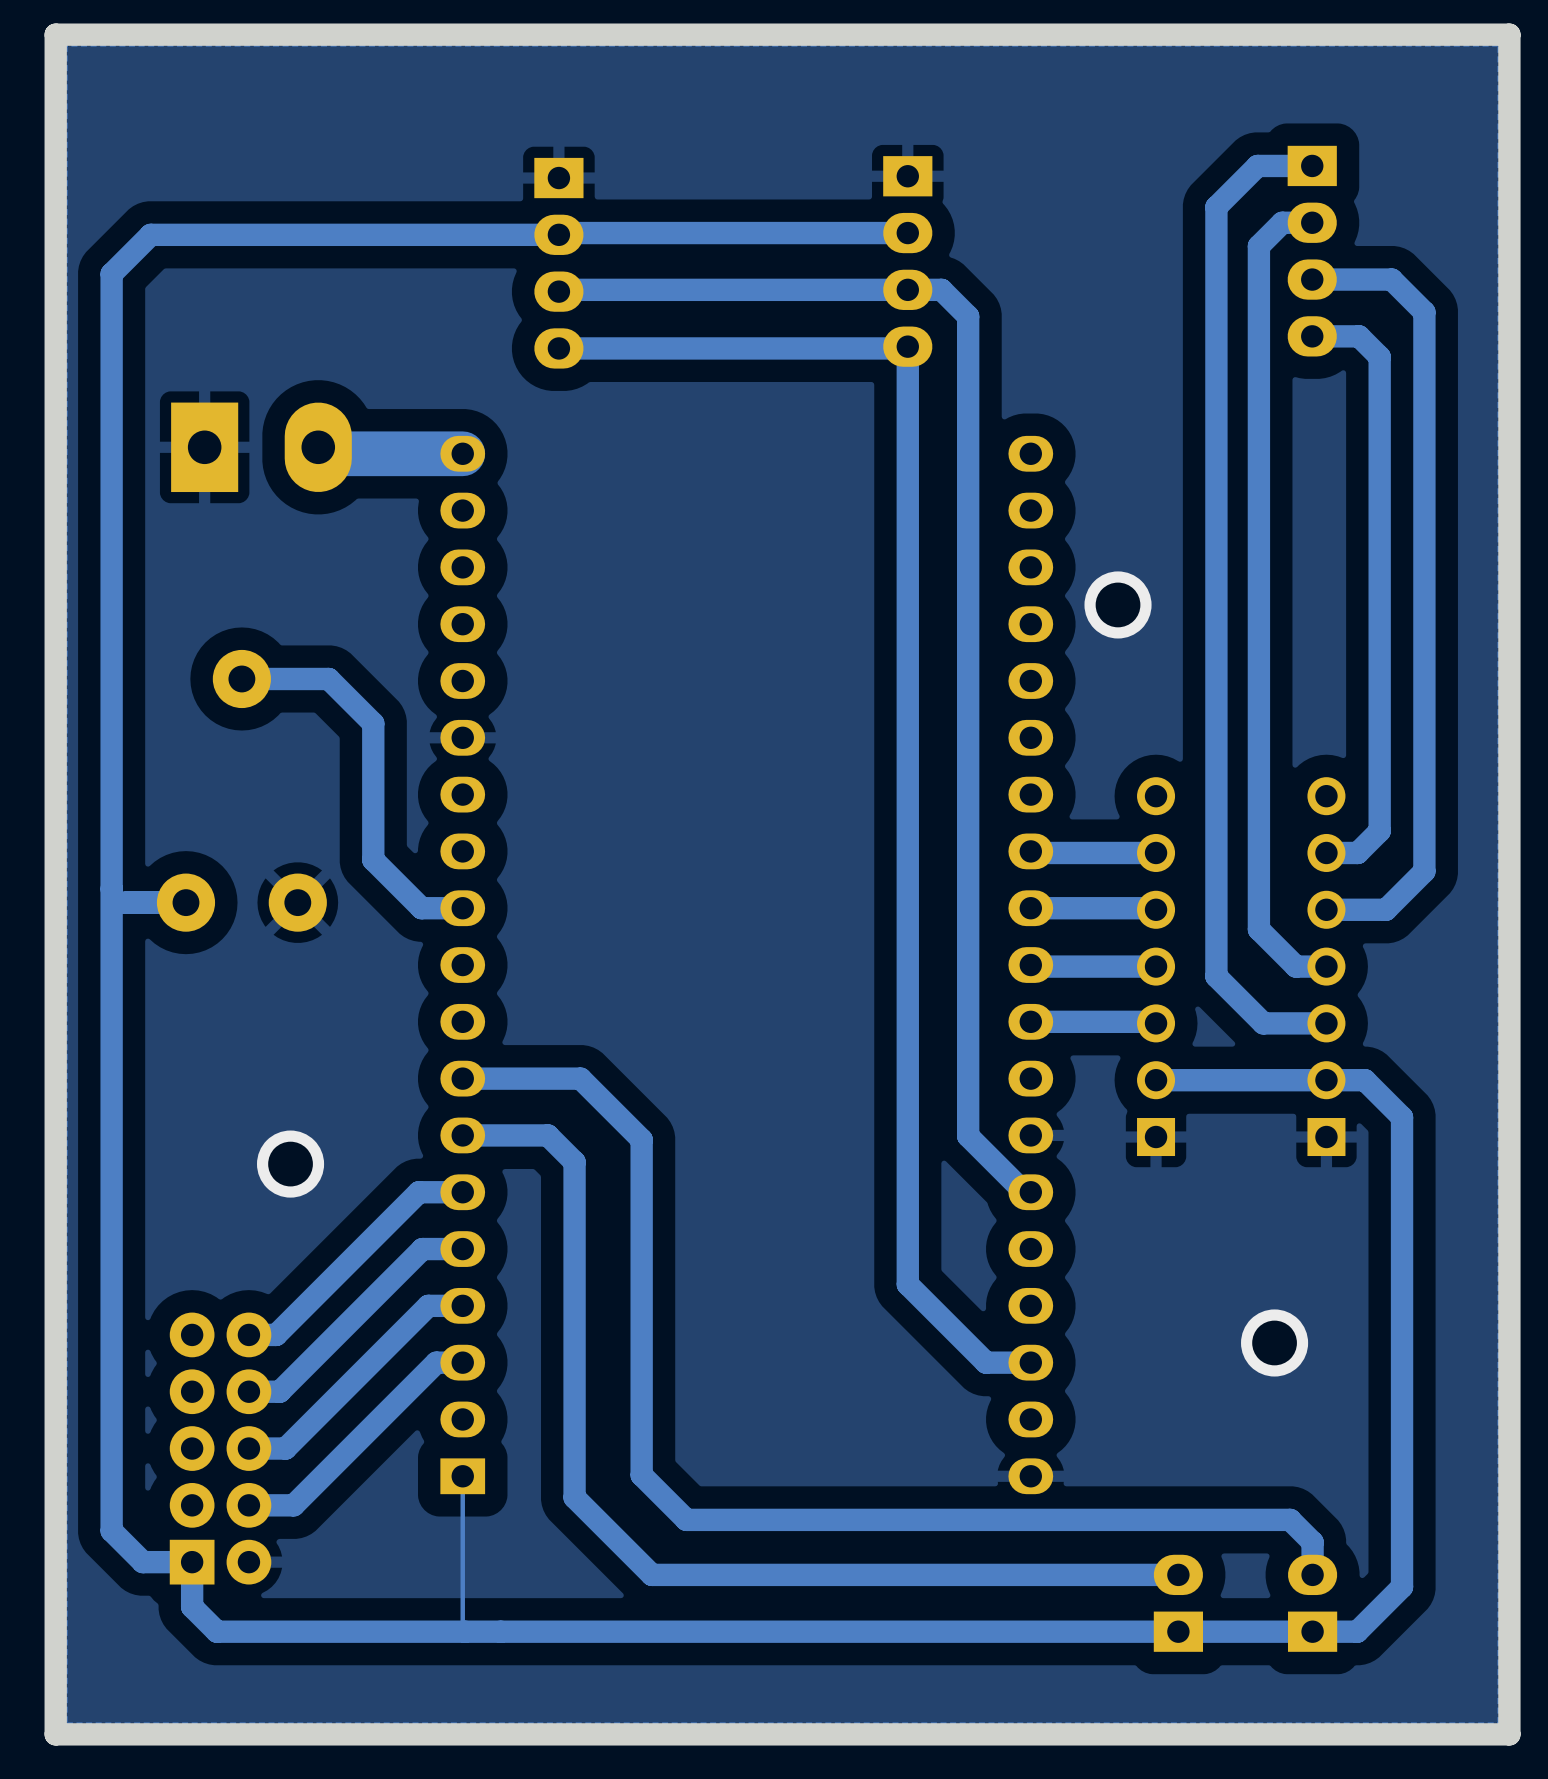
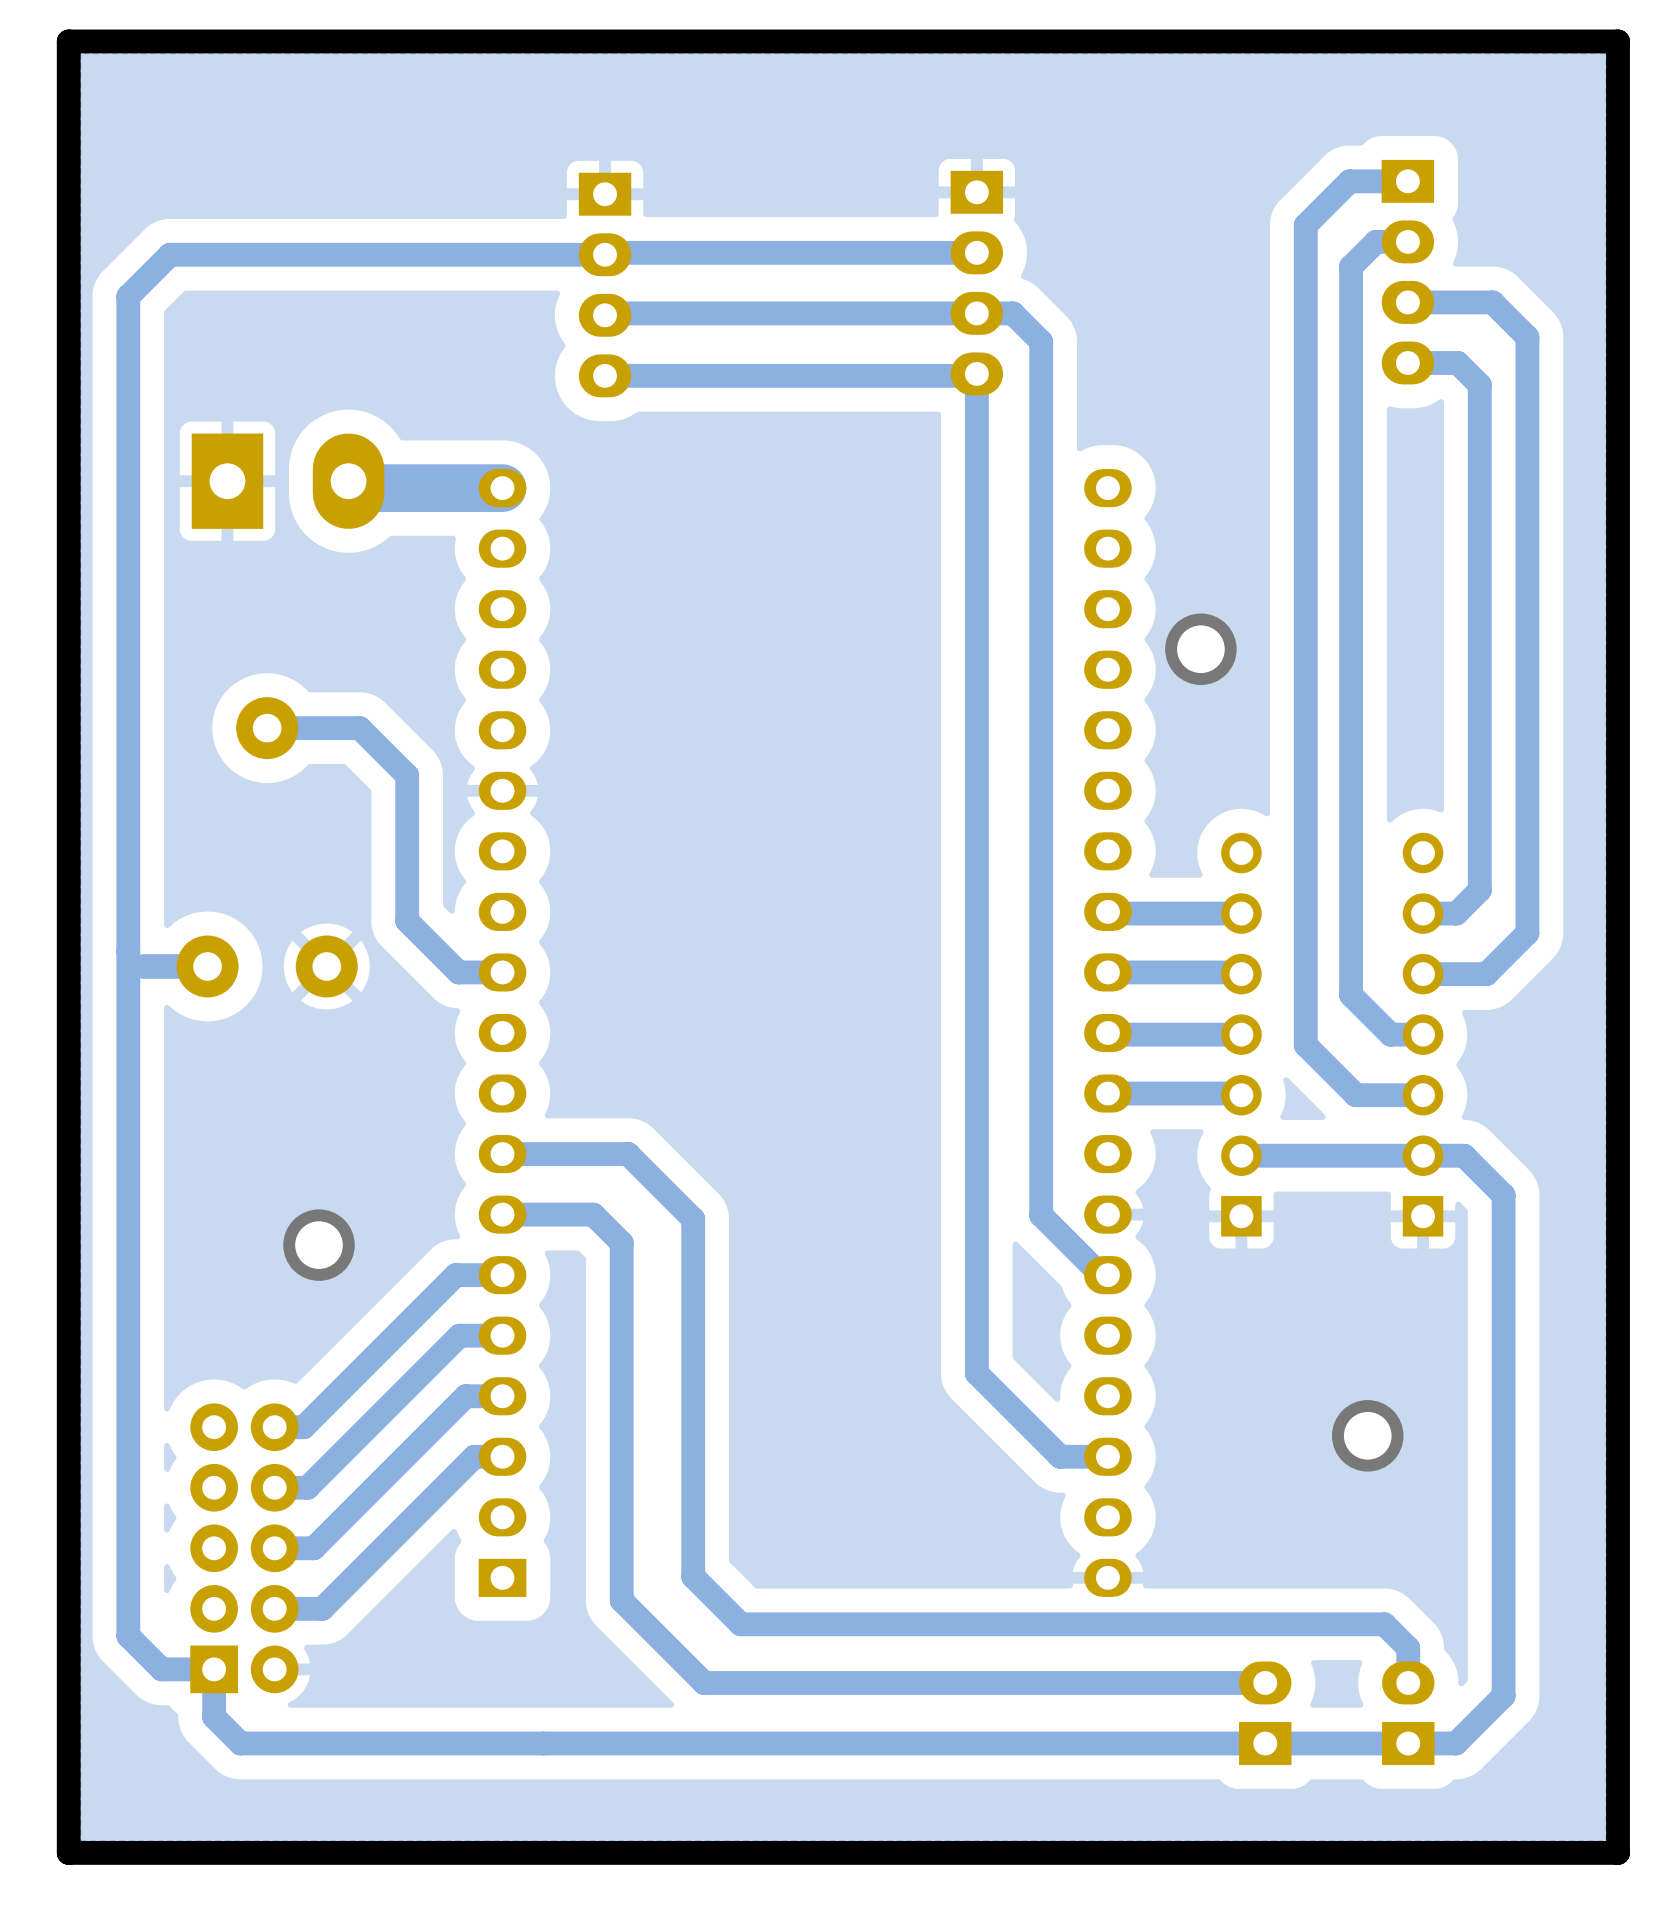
track: (462, 1476) (462, 1629) (464, 1631) -> none

